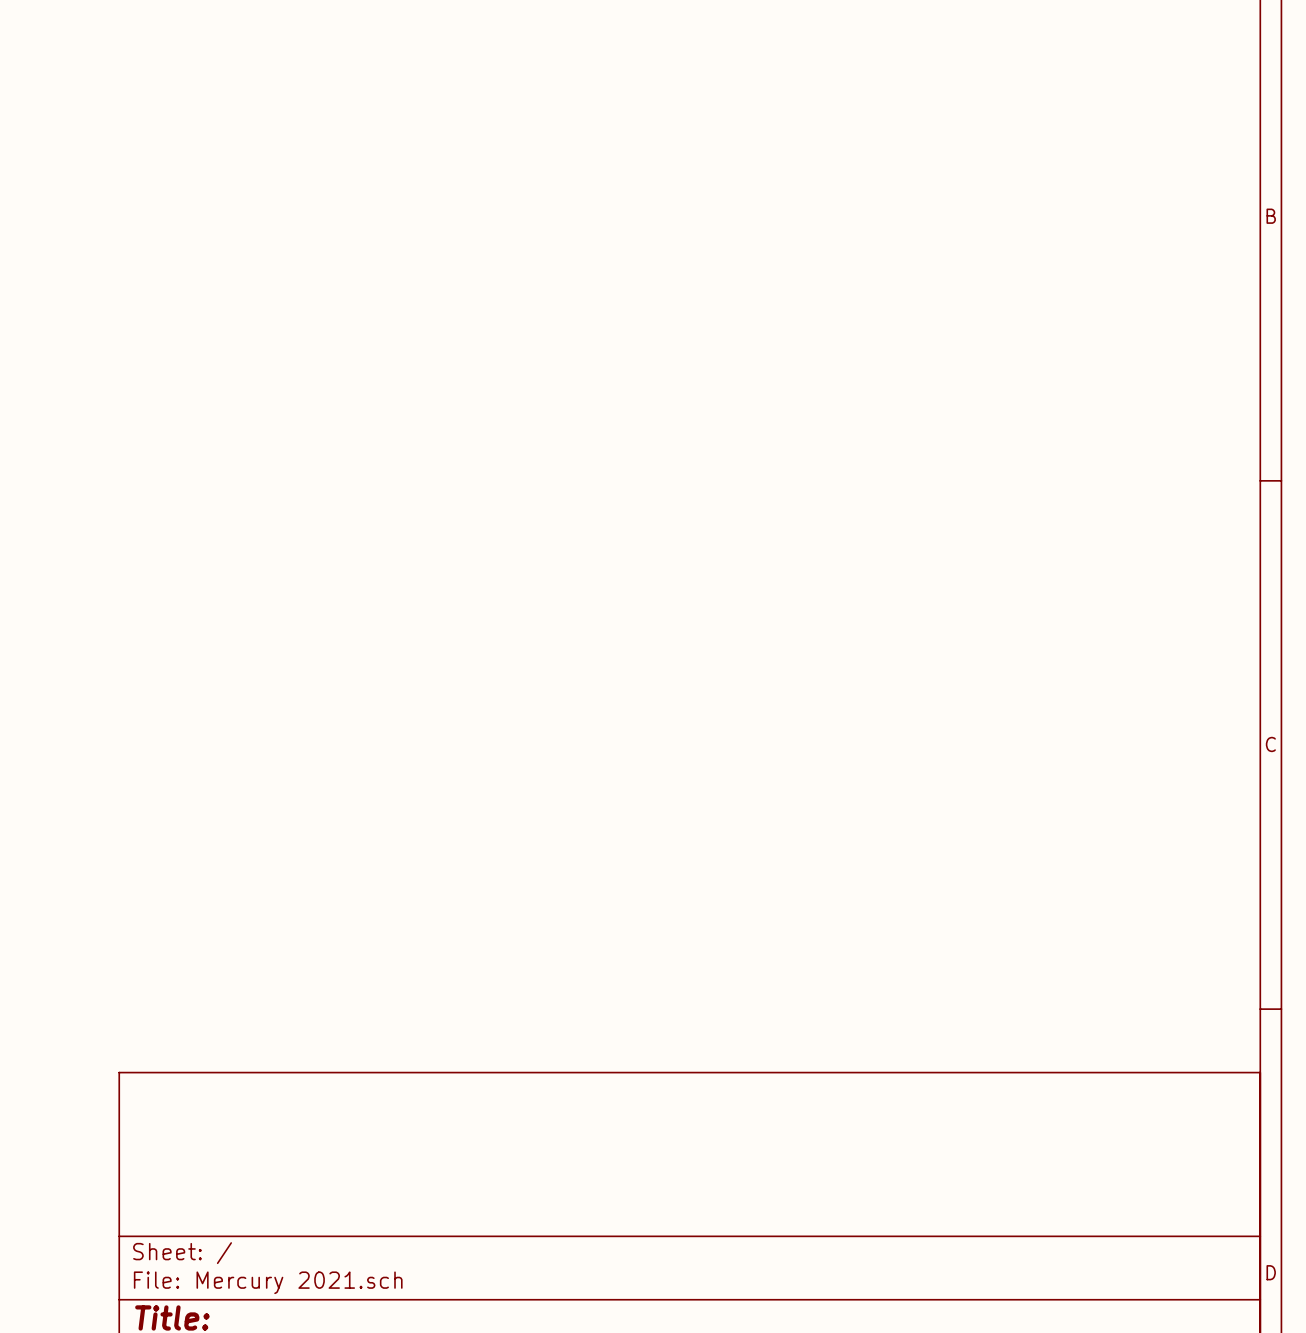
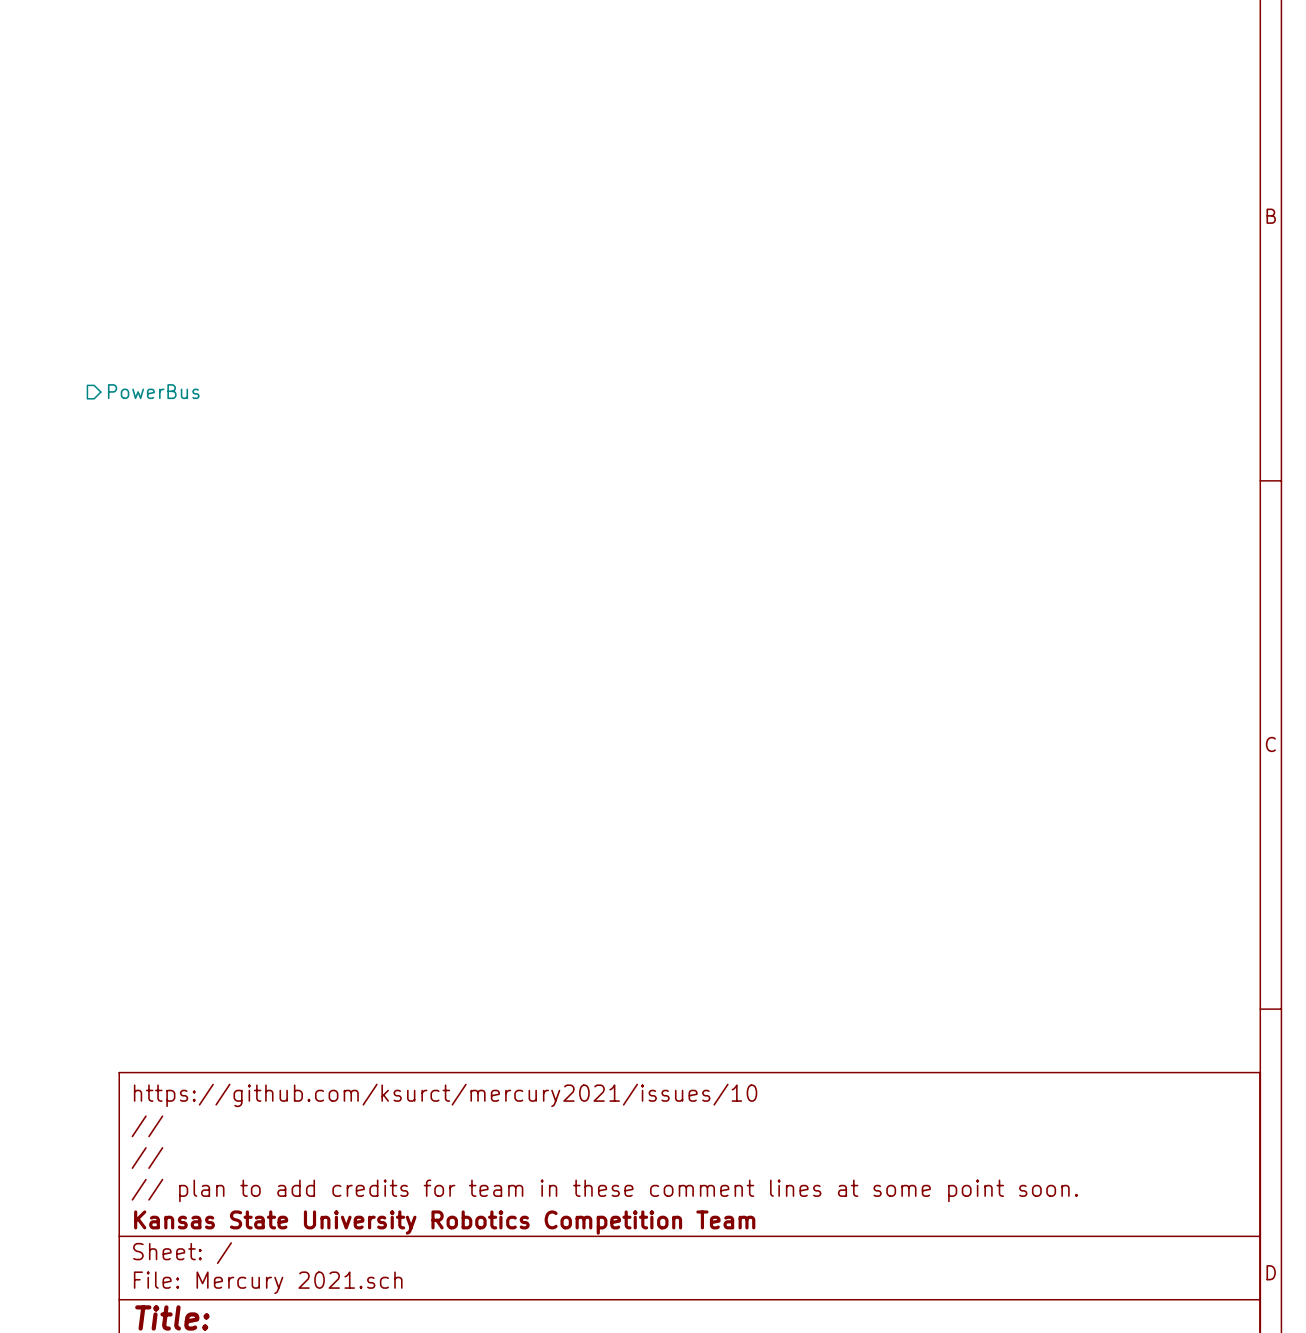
sheet pin: none -> PowerBus (153, 391)
title block: none -> https://github.com/ksurct/mercury2021/issues/10 (445, 1095)
title block: none -> // (147, 1126)
title block: none -> // (147, 1158)
title block: none -> // plan to add credits for team in these comment lines at some point soon. (604, 1190)
title block: none -> Kansas State University Robotics Competition Team (444, 1222)

